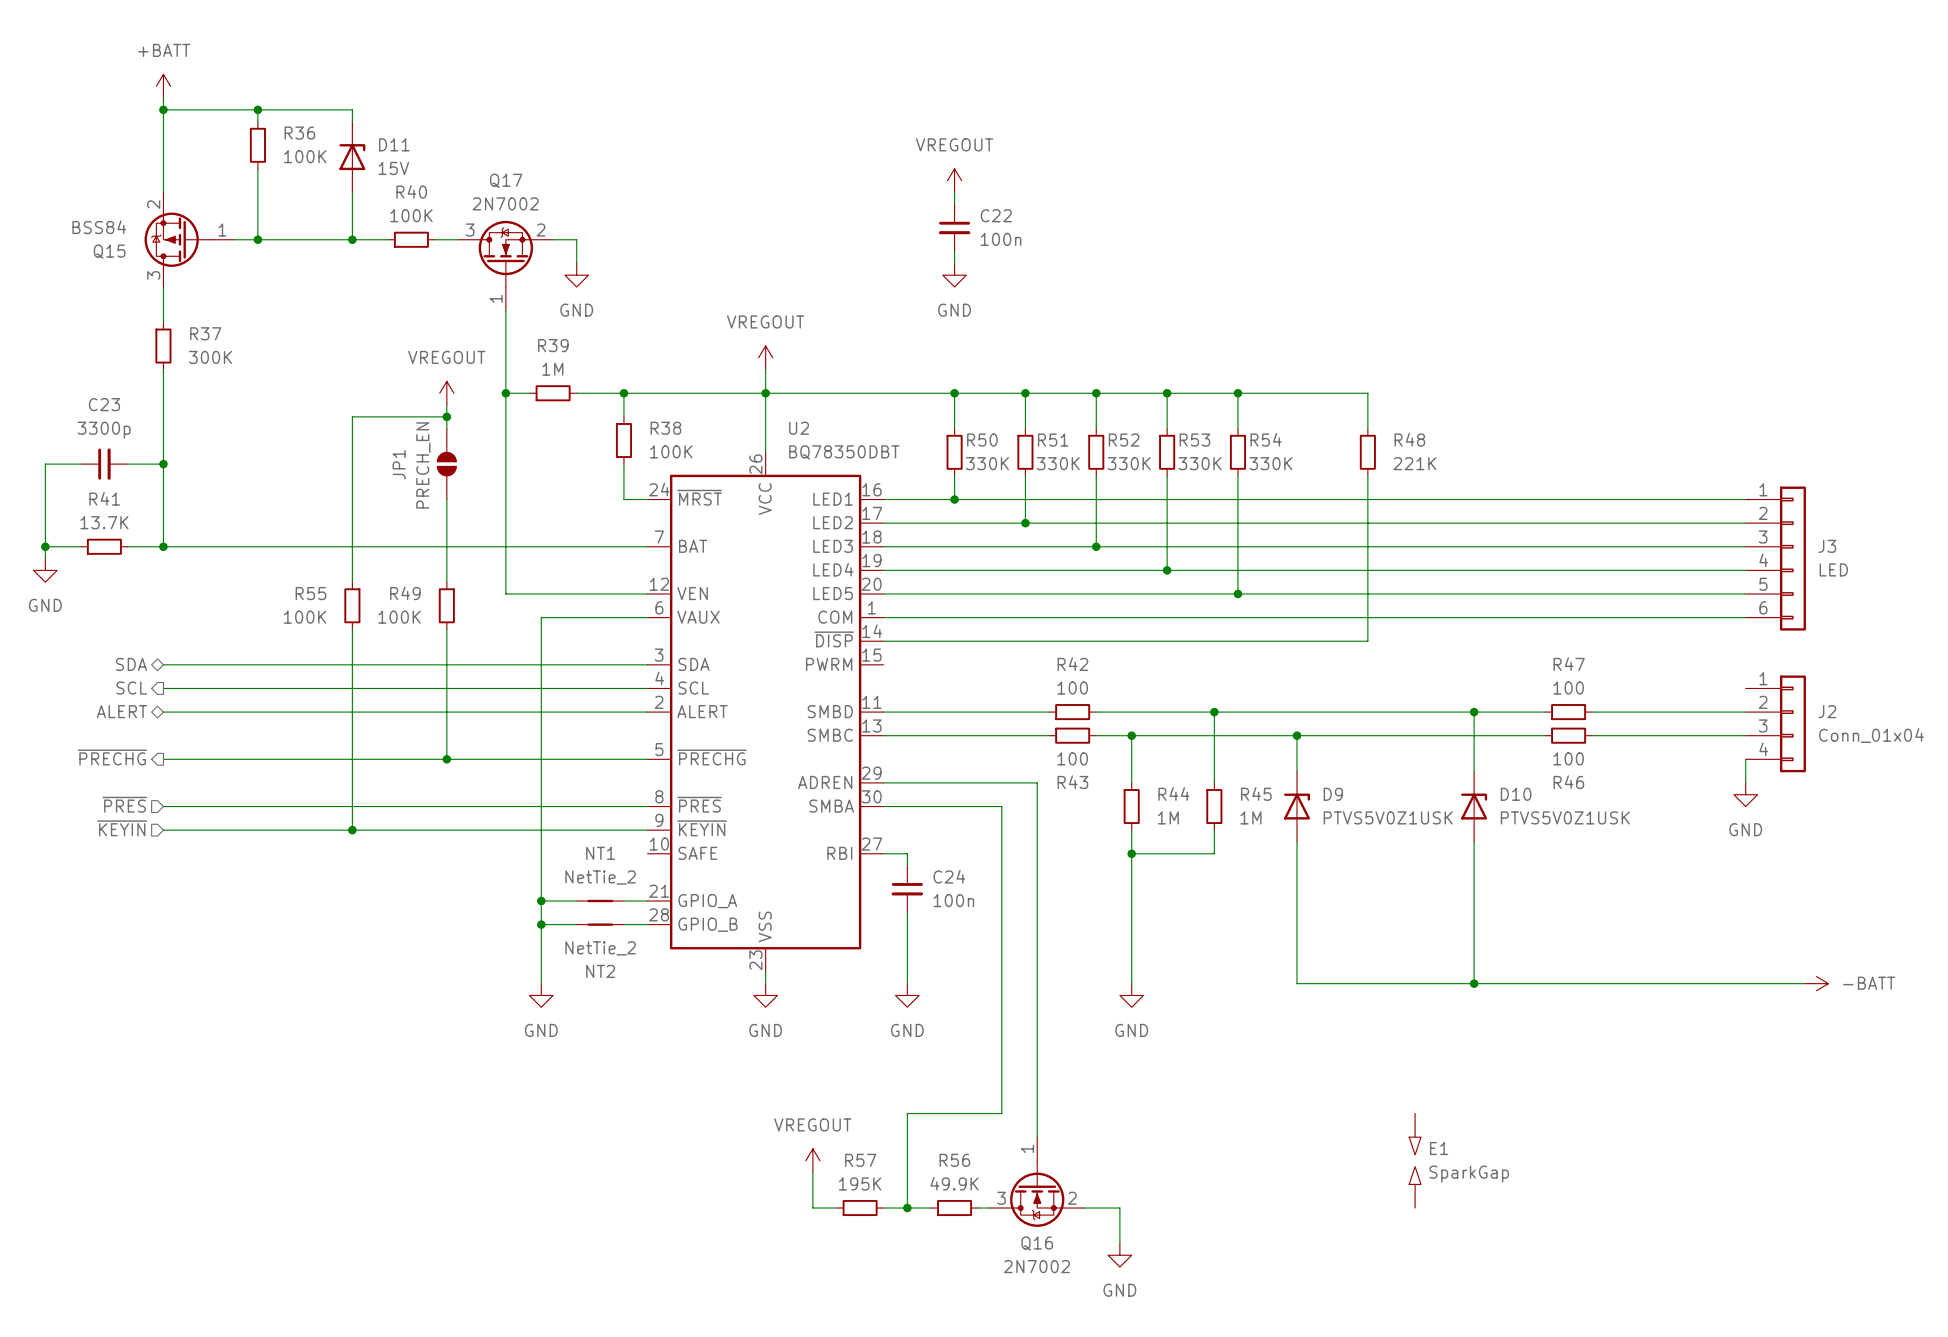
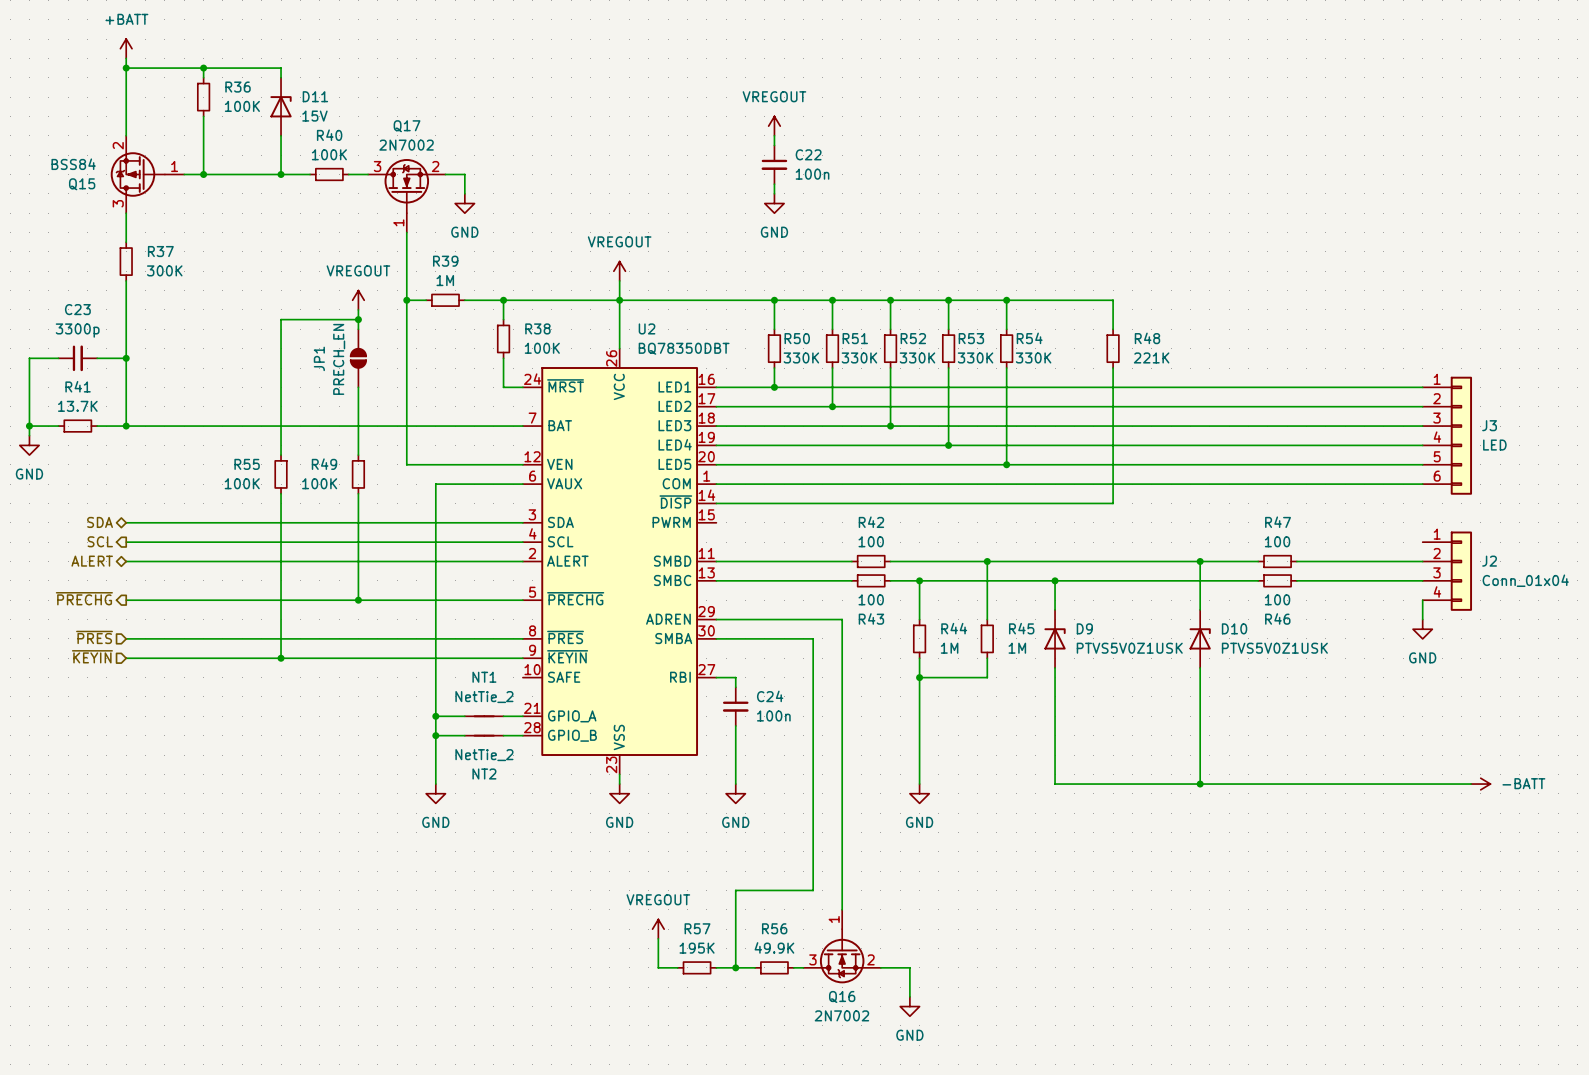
E1: SparkGap (1415, 1160) -> none

